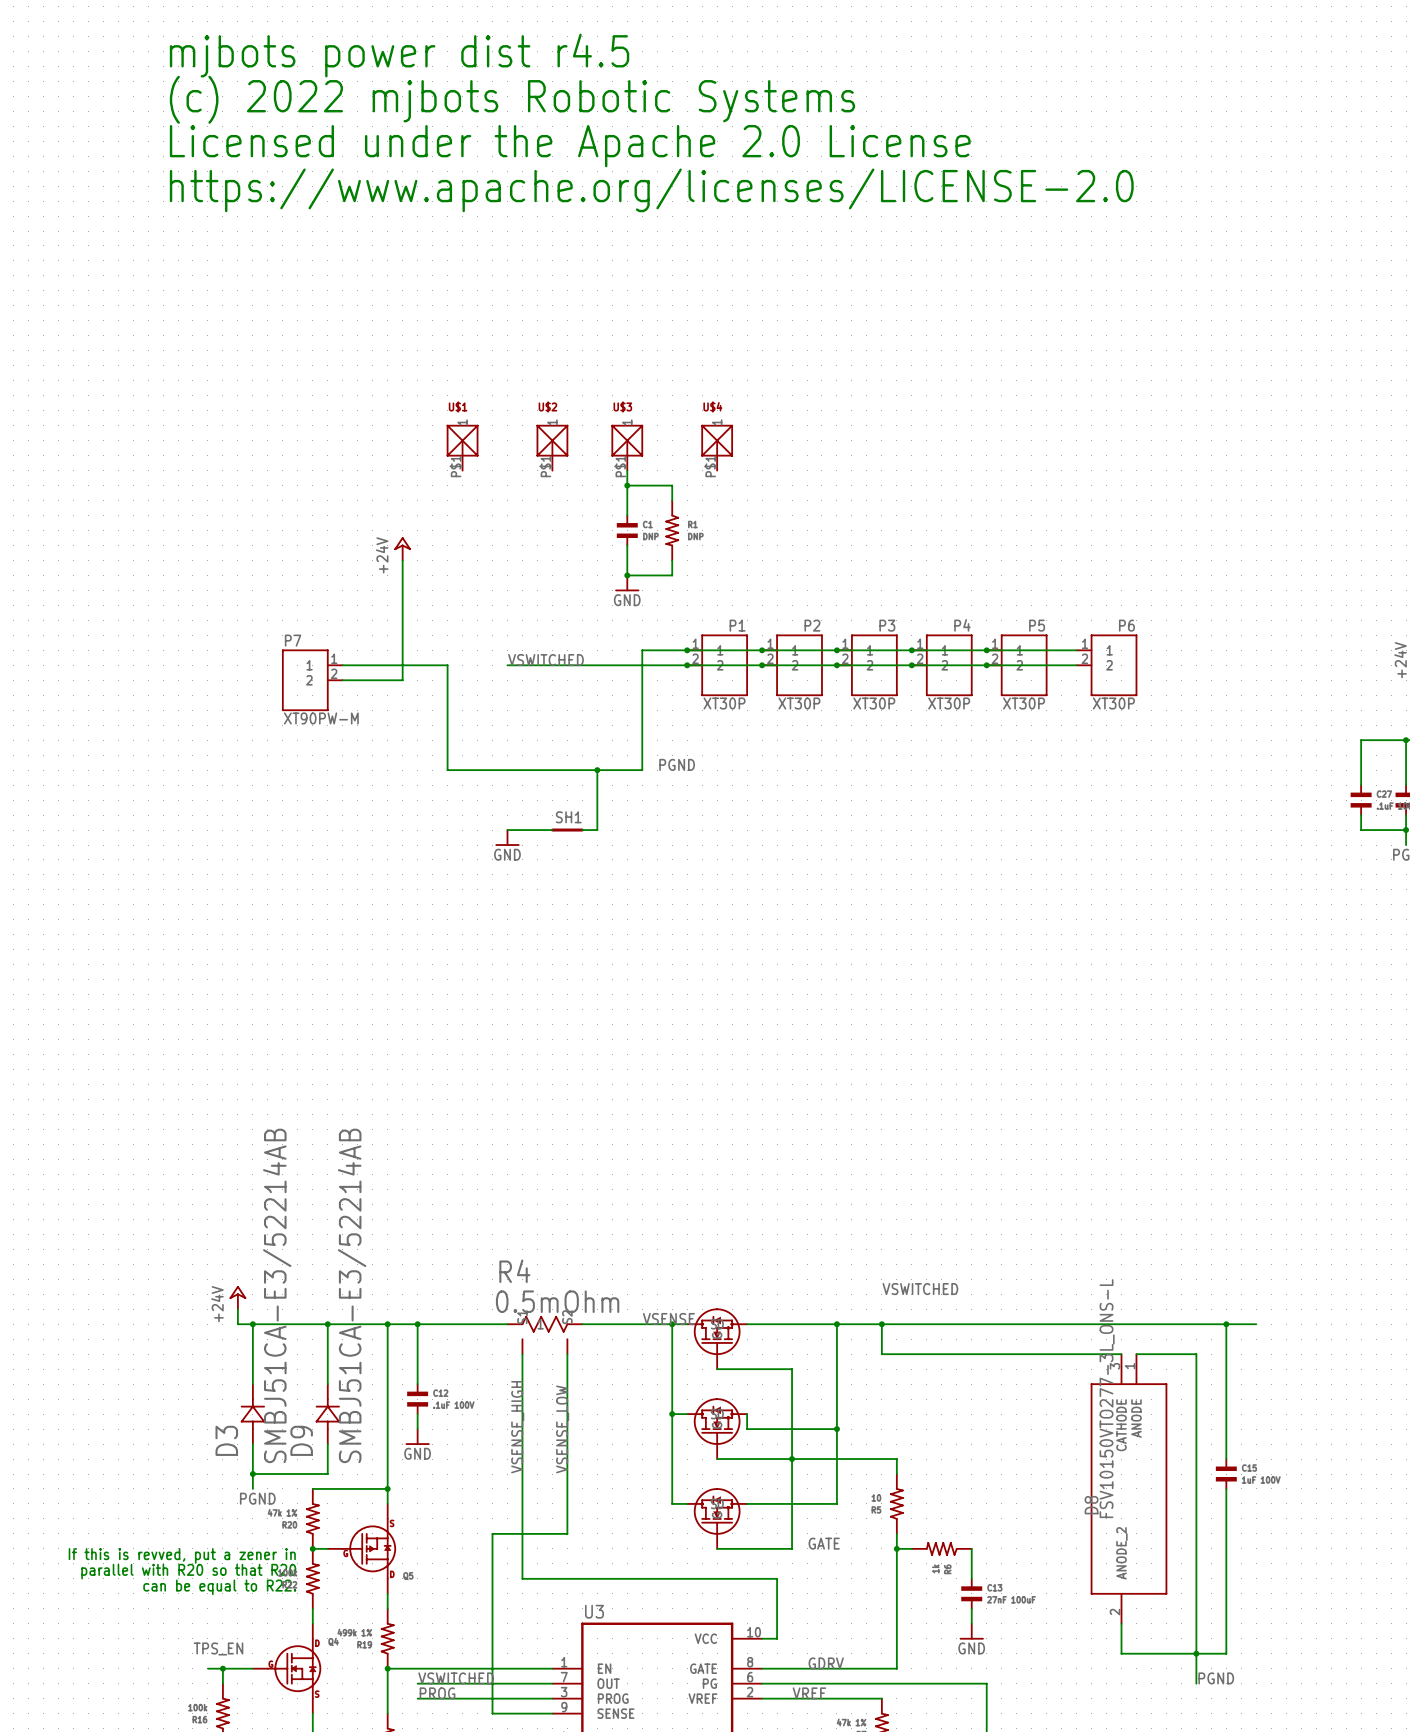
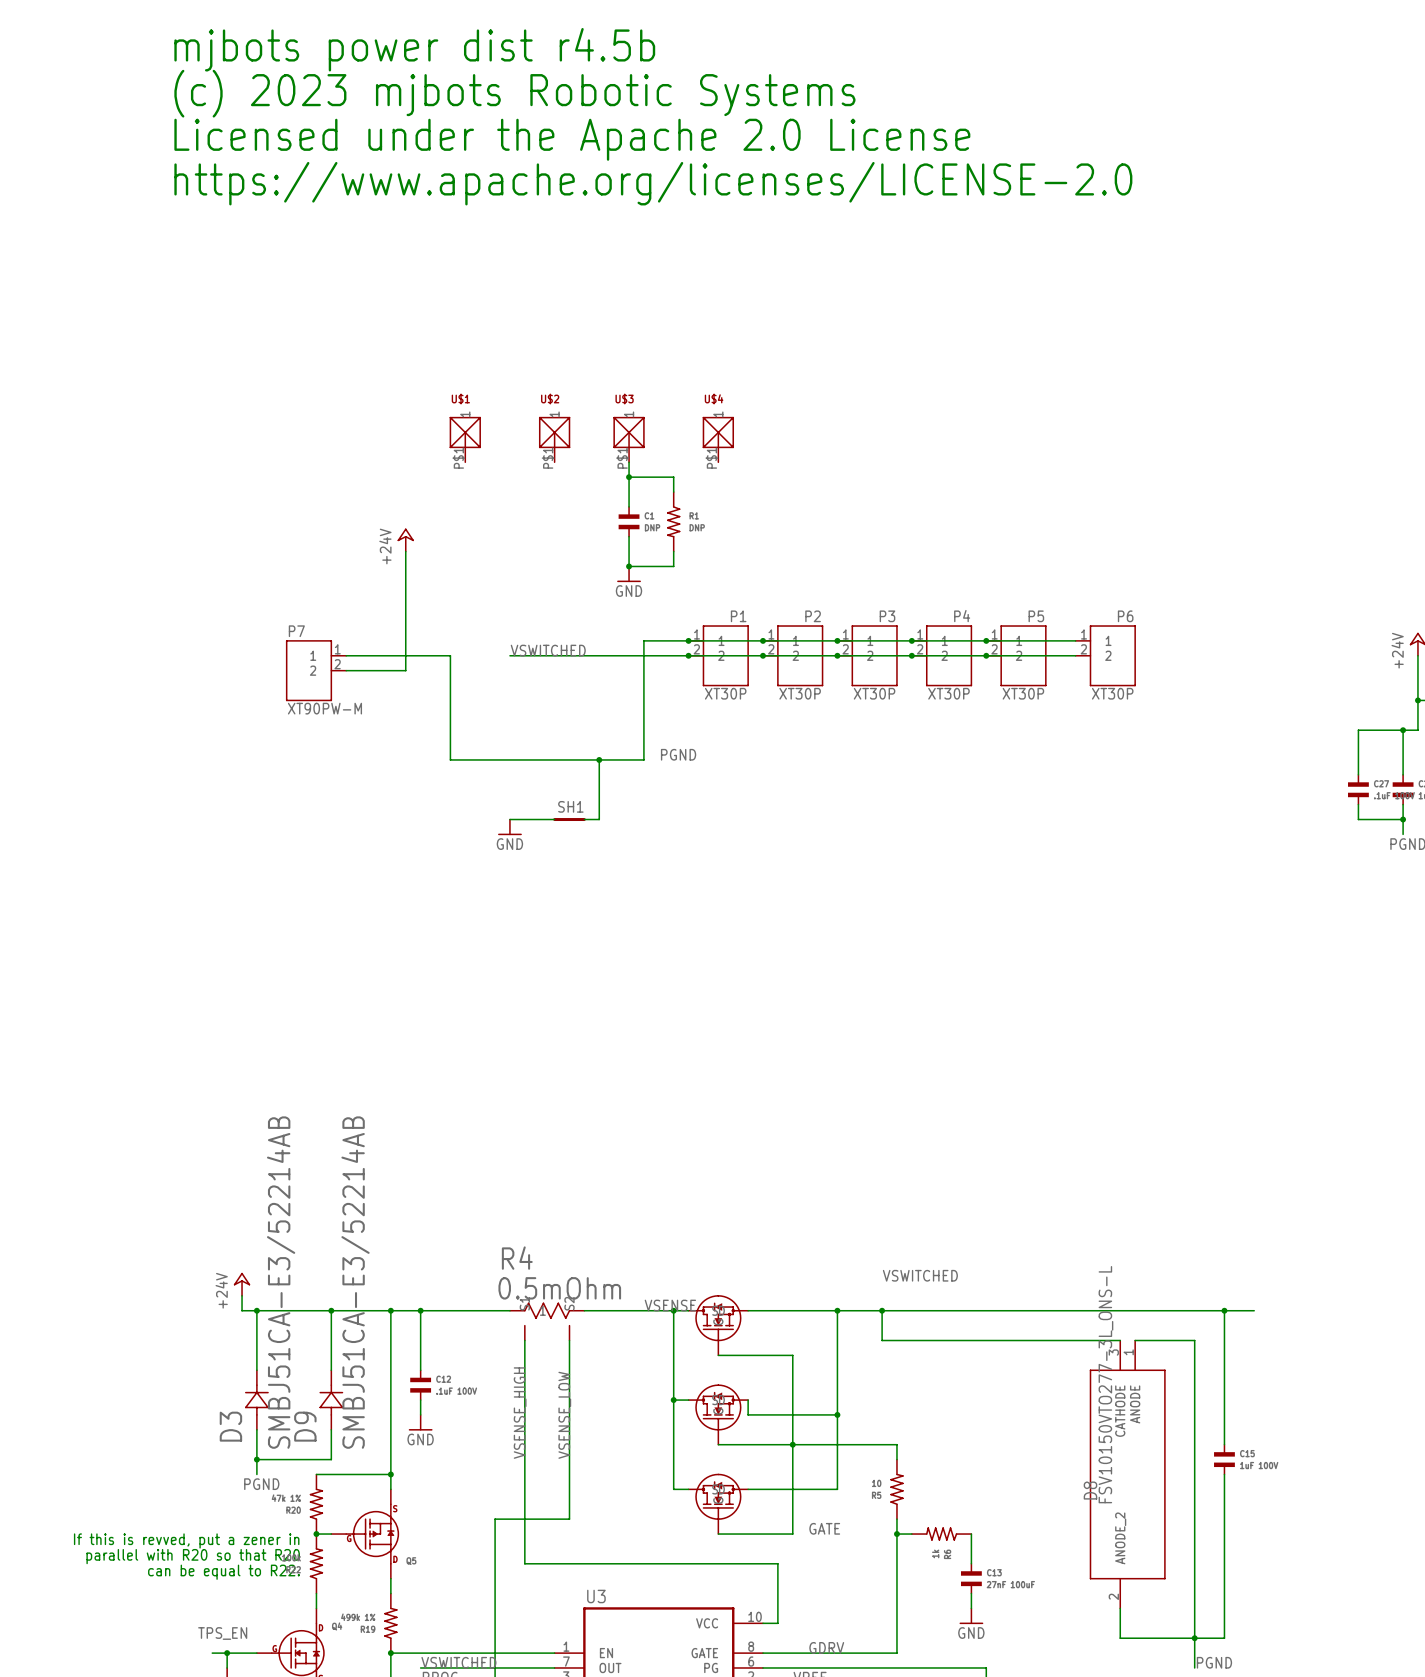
text: mjbots power dist r4.5 (399, 55) -> mjbots power dist r4.5b (414, 49)
text: (c) 2022 mjbots Robotic Systems (512, 99) -> (c) 2023 mjbots Robotic Systems (514, 93)

